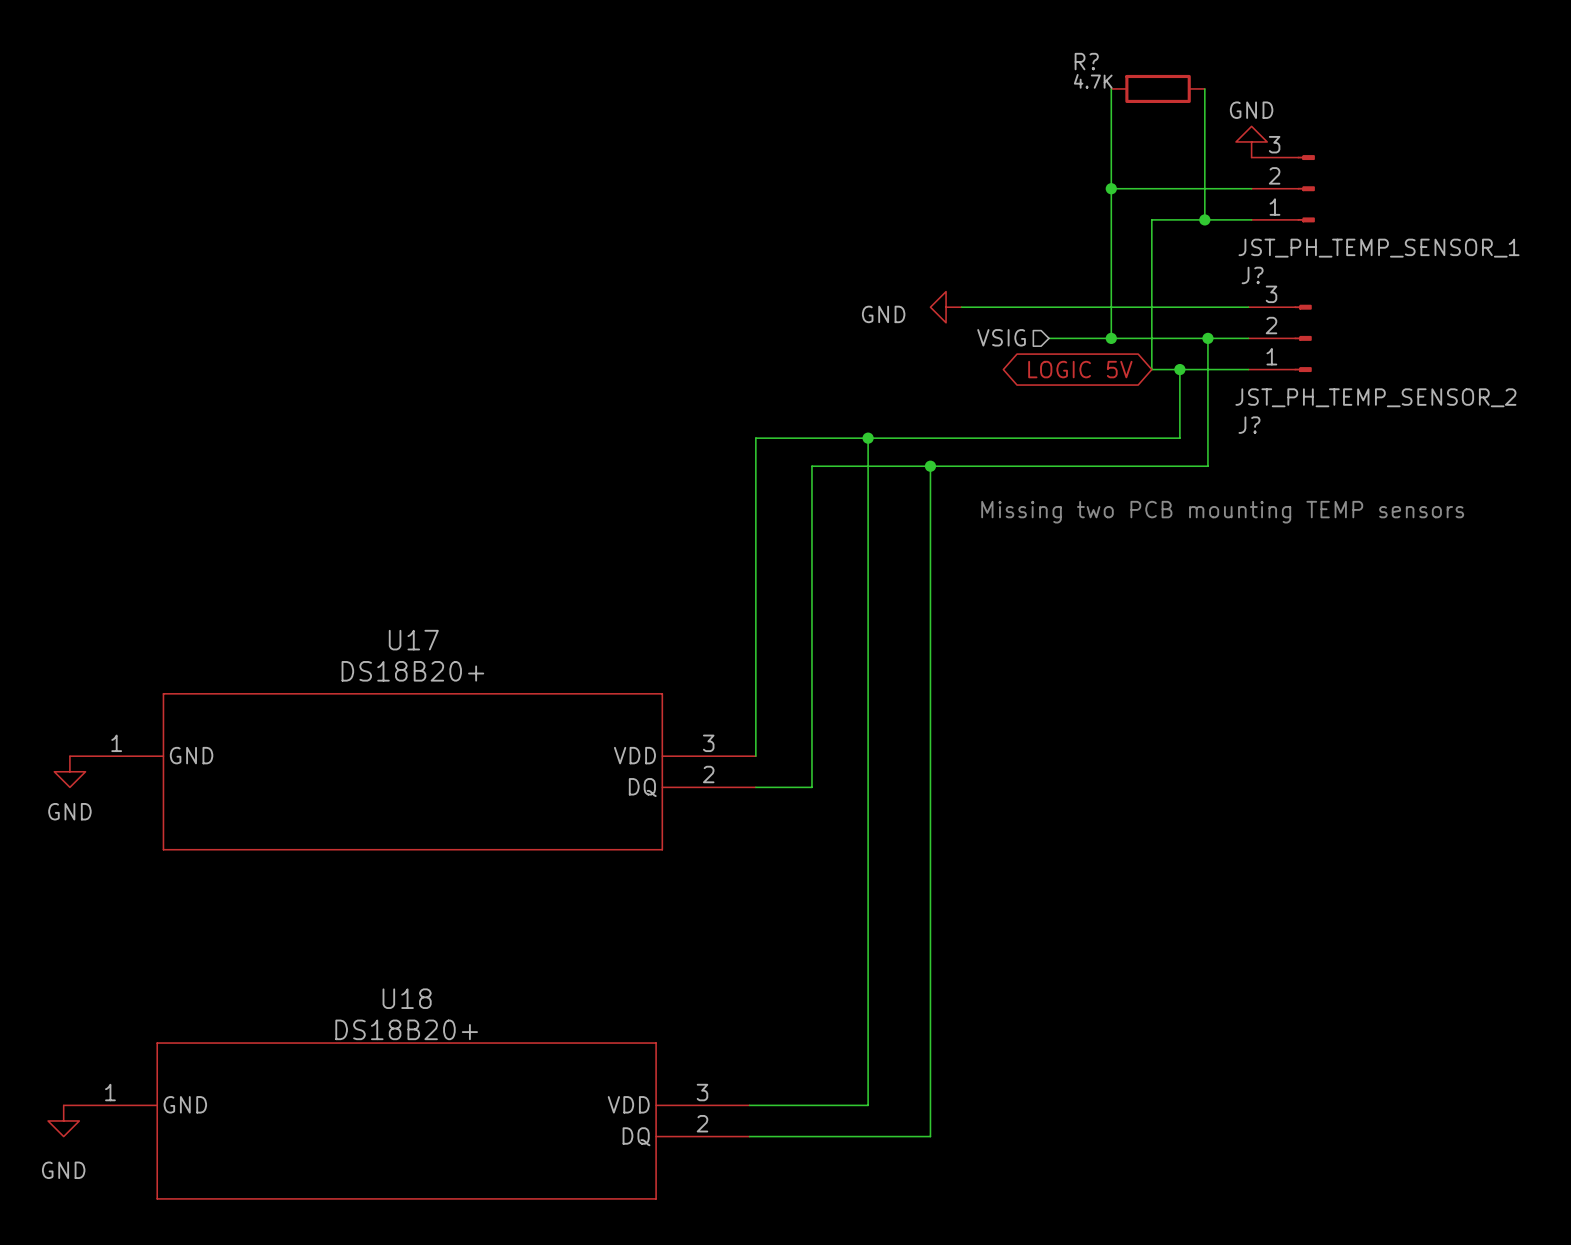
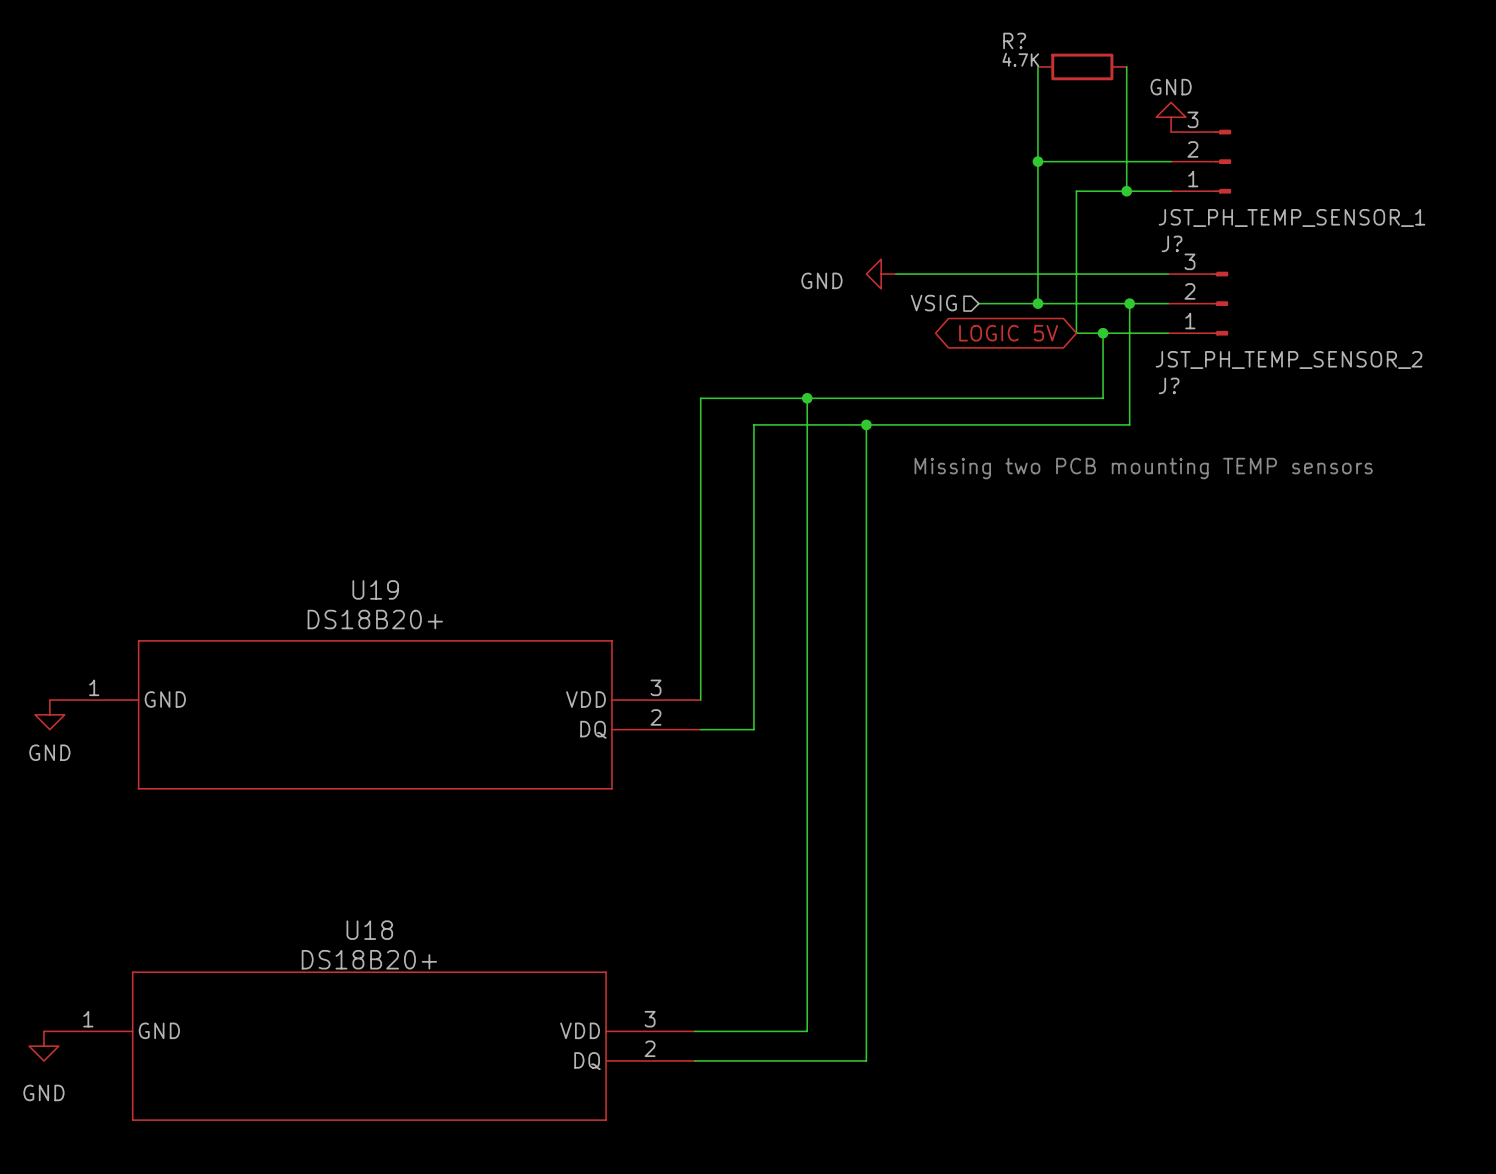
U17 name: U17 (413, 640) -> U19 (375, 589)

